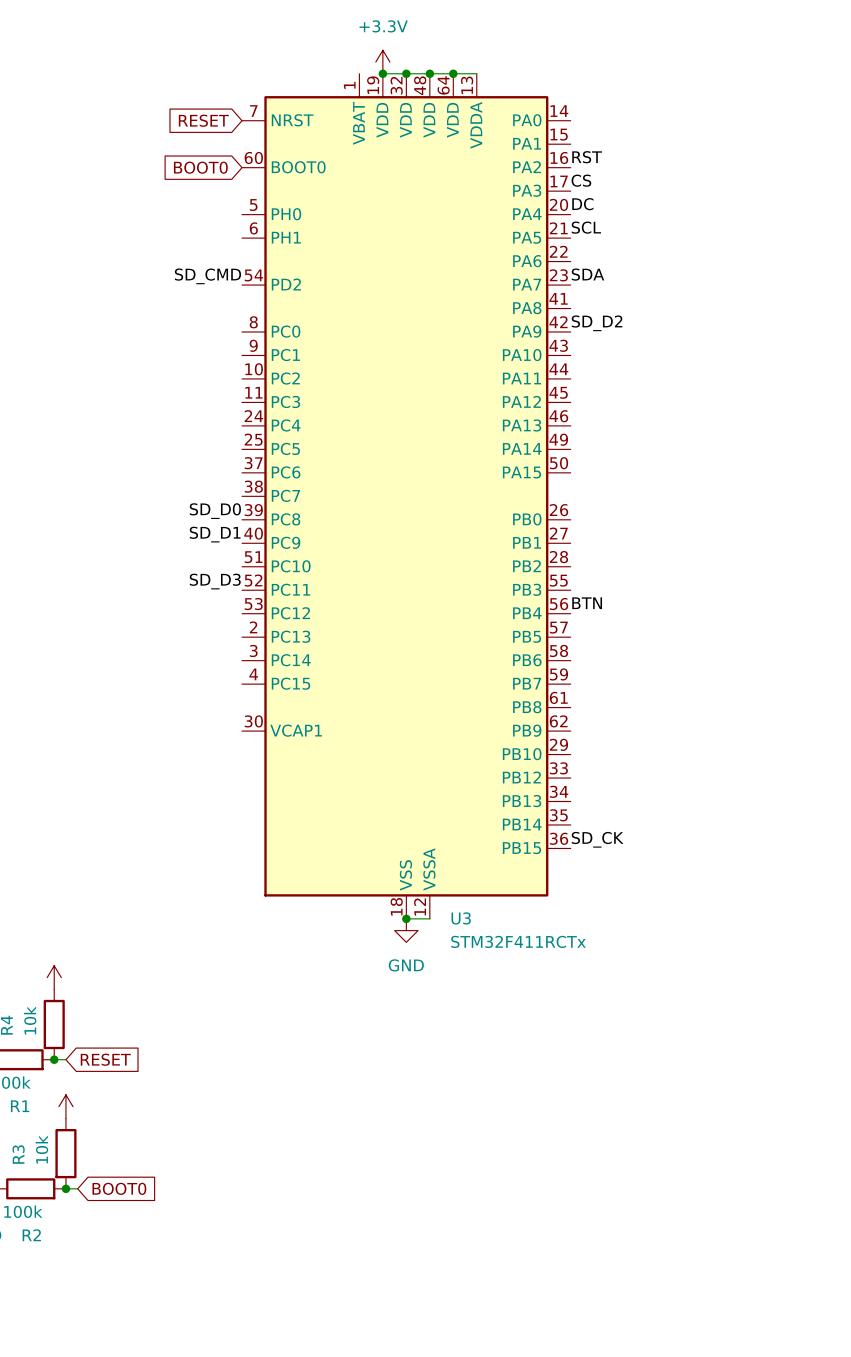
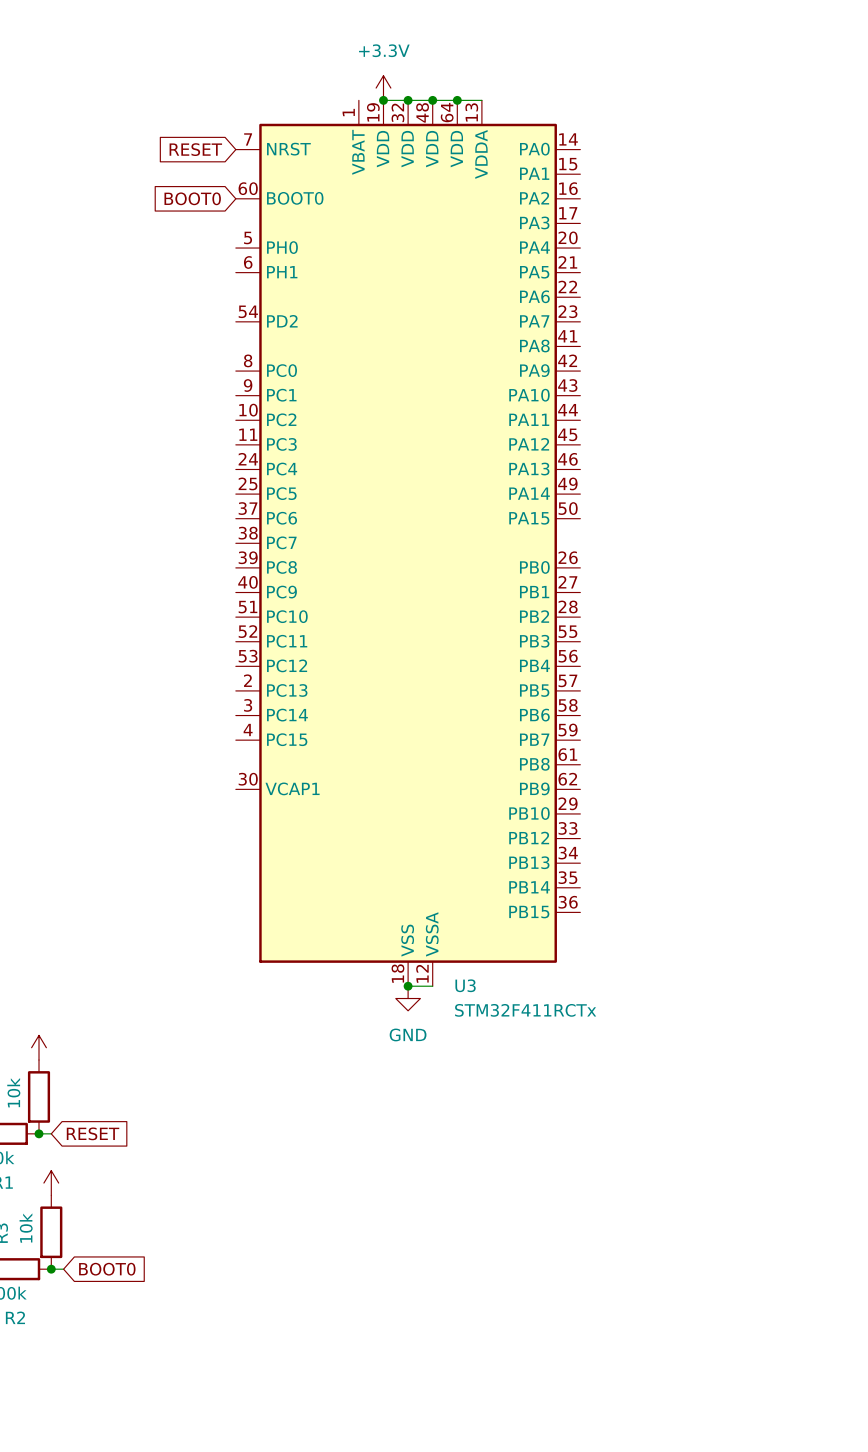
label: RST (587, 157) -> none
label: CS (581, 180) -> none
label: DC (582, 204) -> none
label: SCL (586, 227) -> none
label: SDA (587, 274) -> none
label: SD_CMD (207, 276) -> none
label: SD_D2 (597, 323) -> none
label: SD_D0 (215, 511) -> none
label: SD_D1 (215, 534) -> none
label: SD_D3 (215, 581) -> none
label: BTN (587, 603) -> none
label: SD_CK (597, 839) -> none

